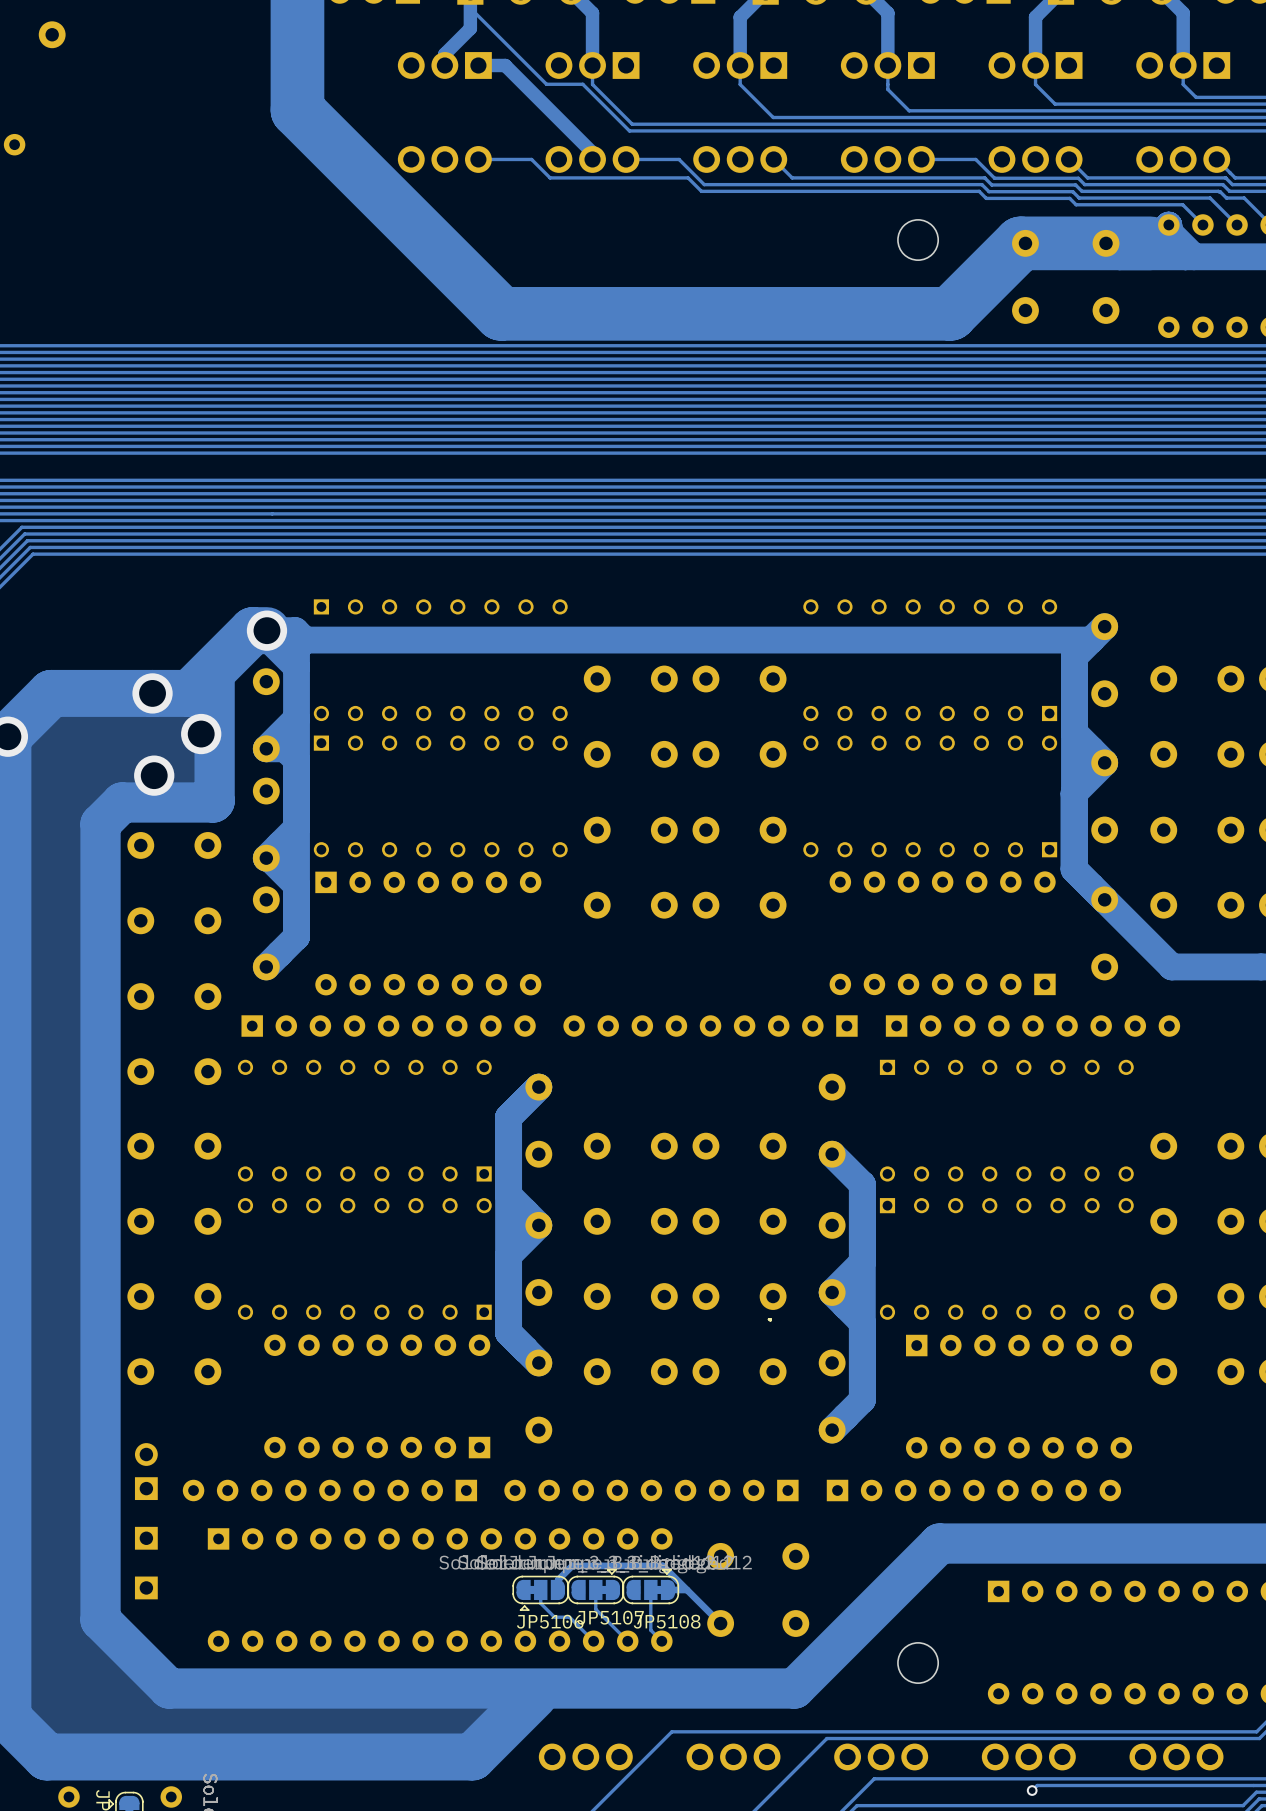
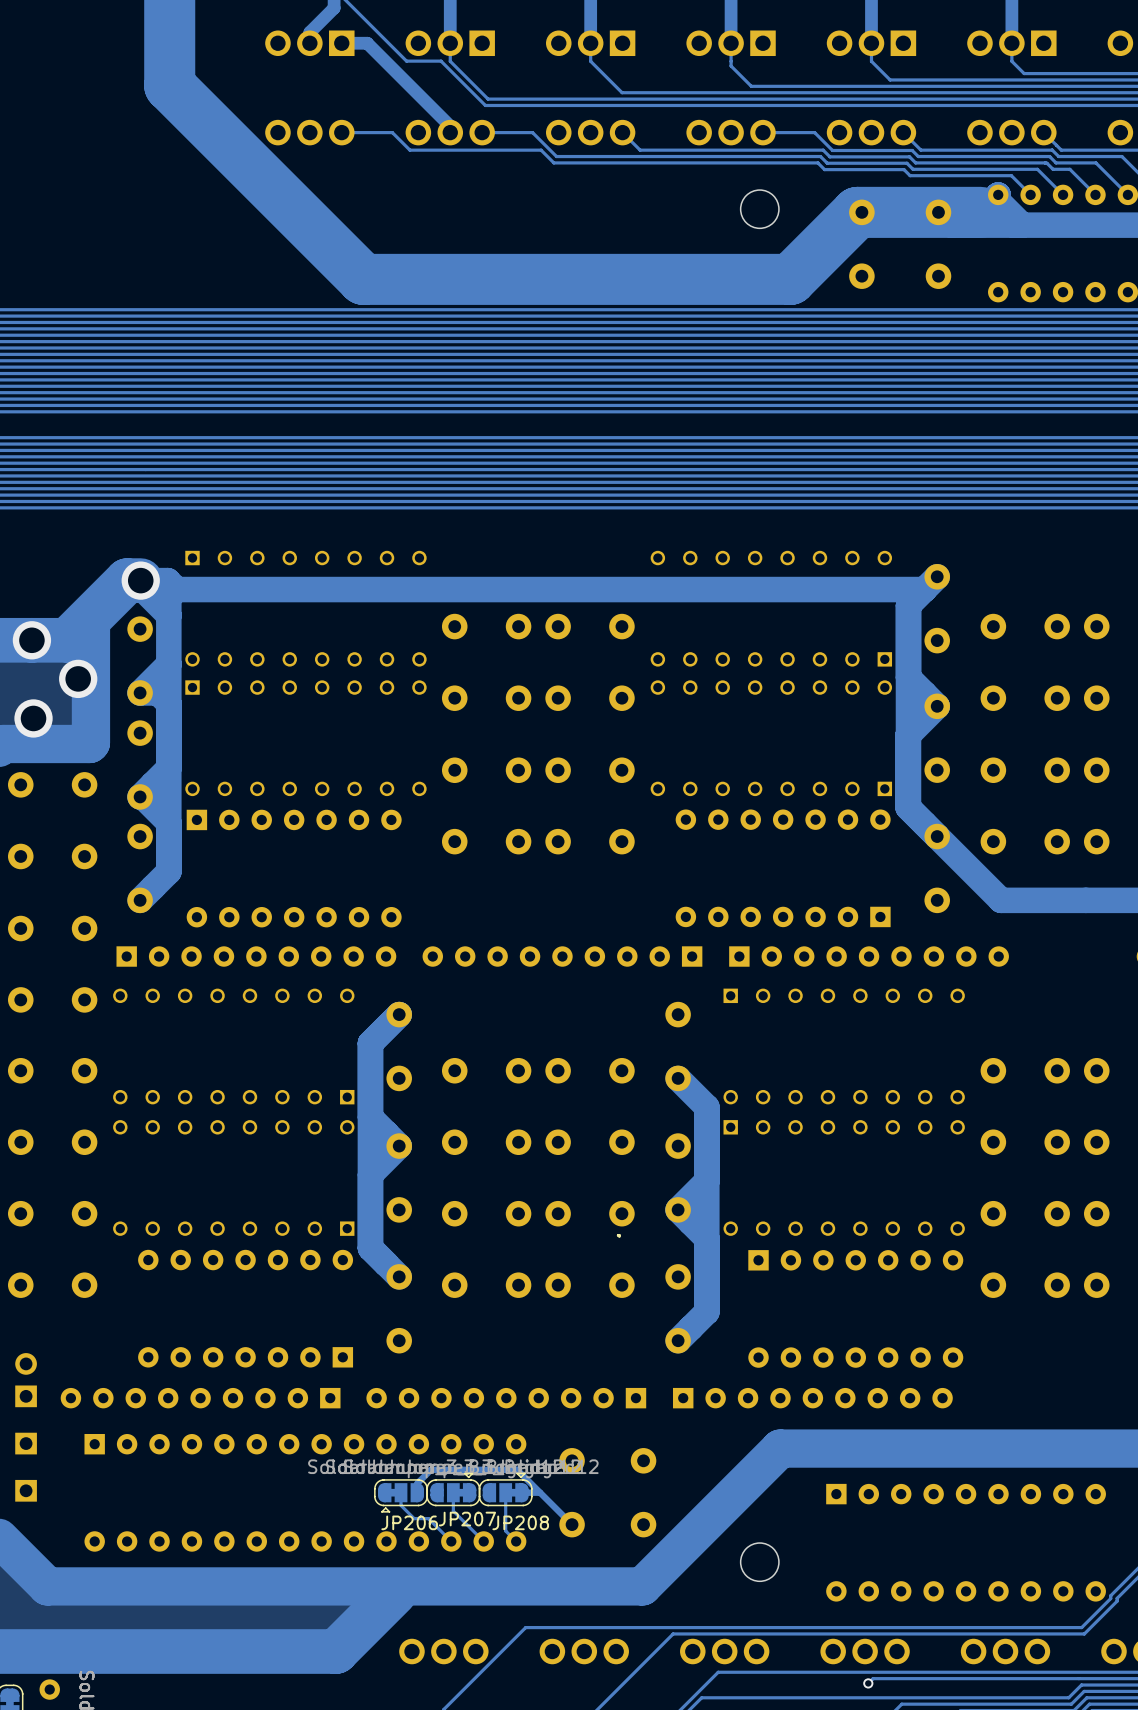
JP5107 name: JP5107 (610, 1617) -> JP207 (467, 1519)
JP5106 name: JP5106 (550, 1621) -> JP206 (409, 1522)
JP5108 name: JP5108 (667, 1621) -> JP208 (520, 1522)

